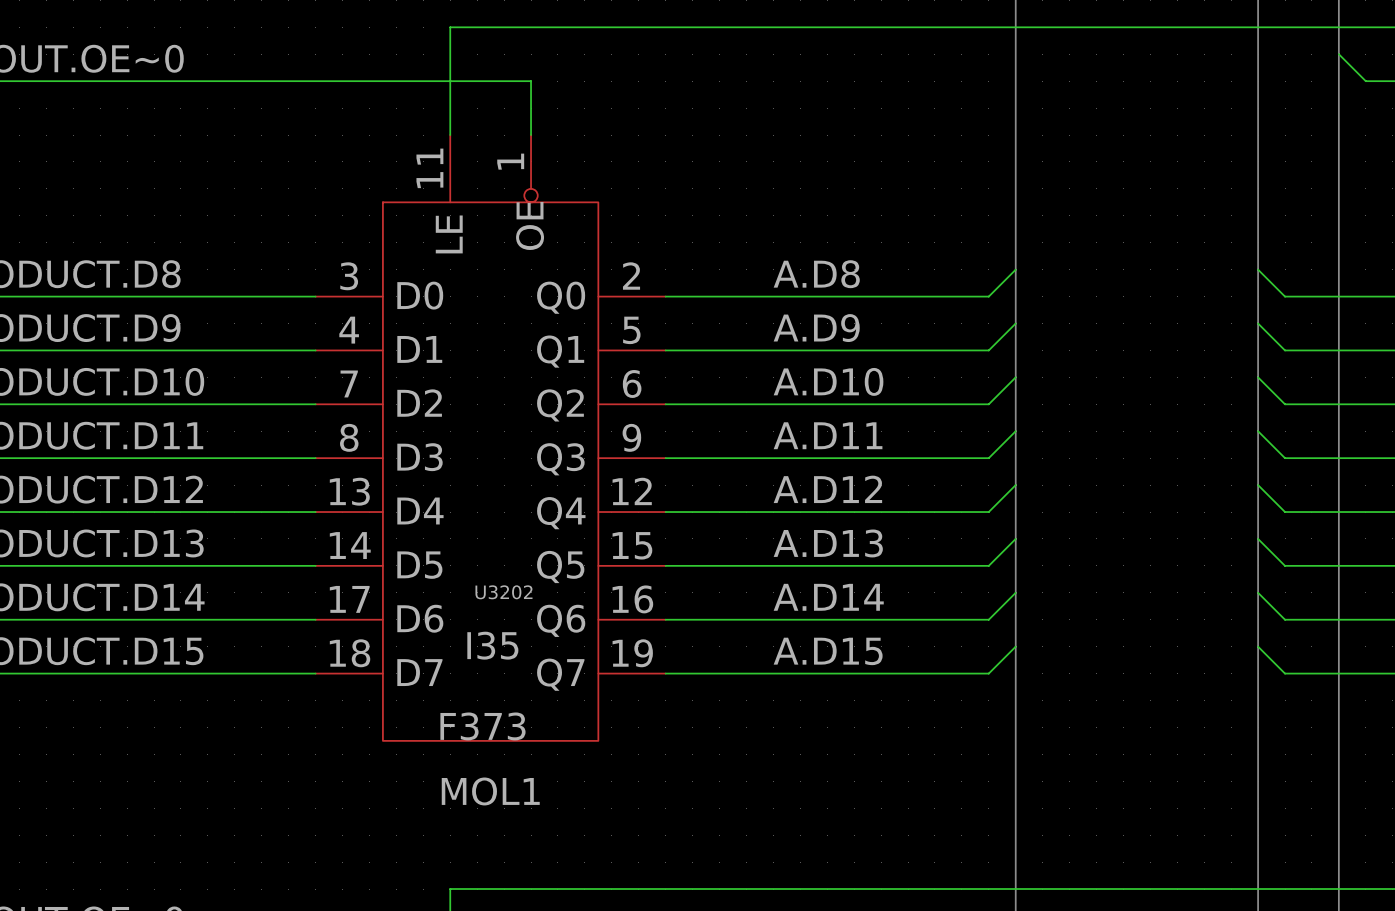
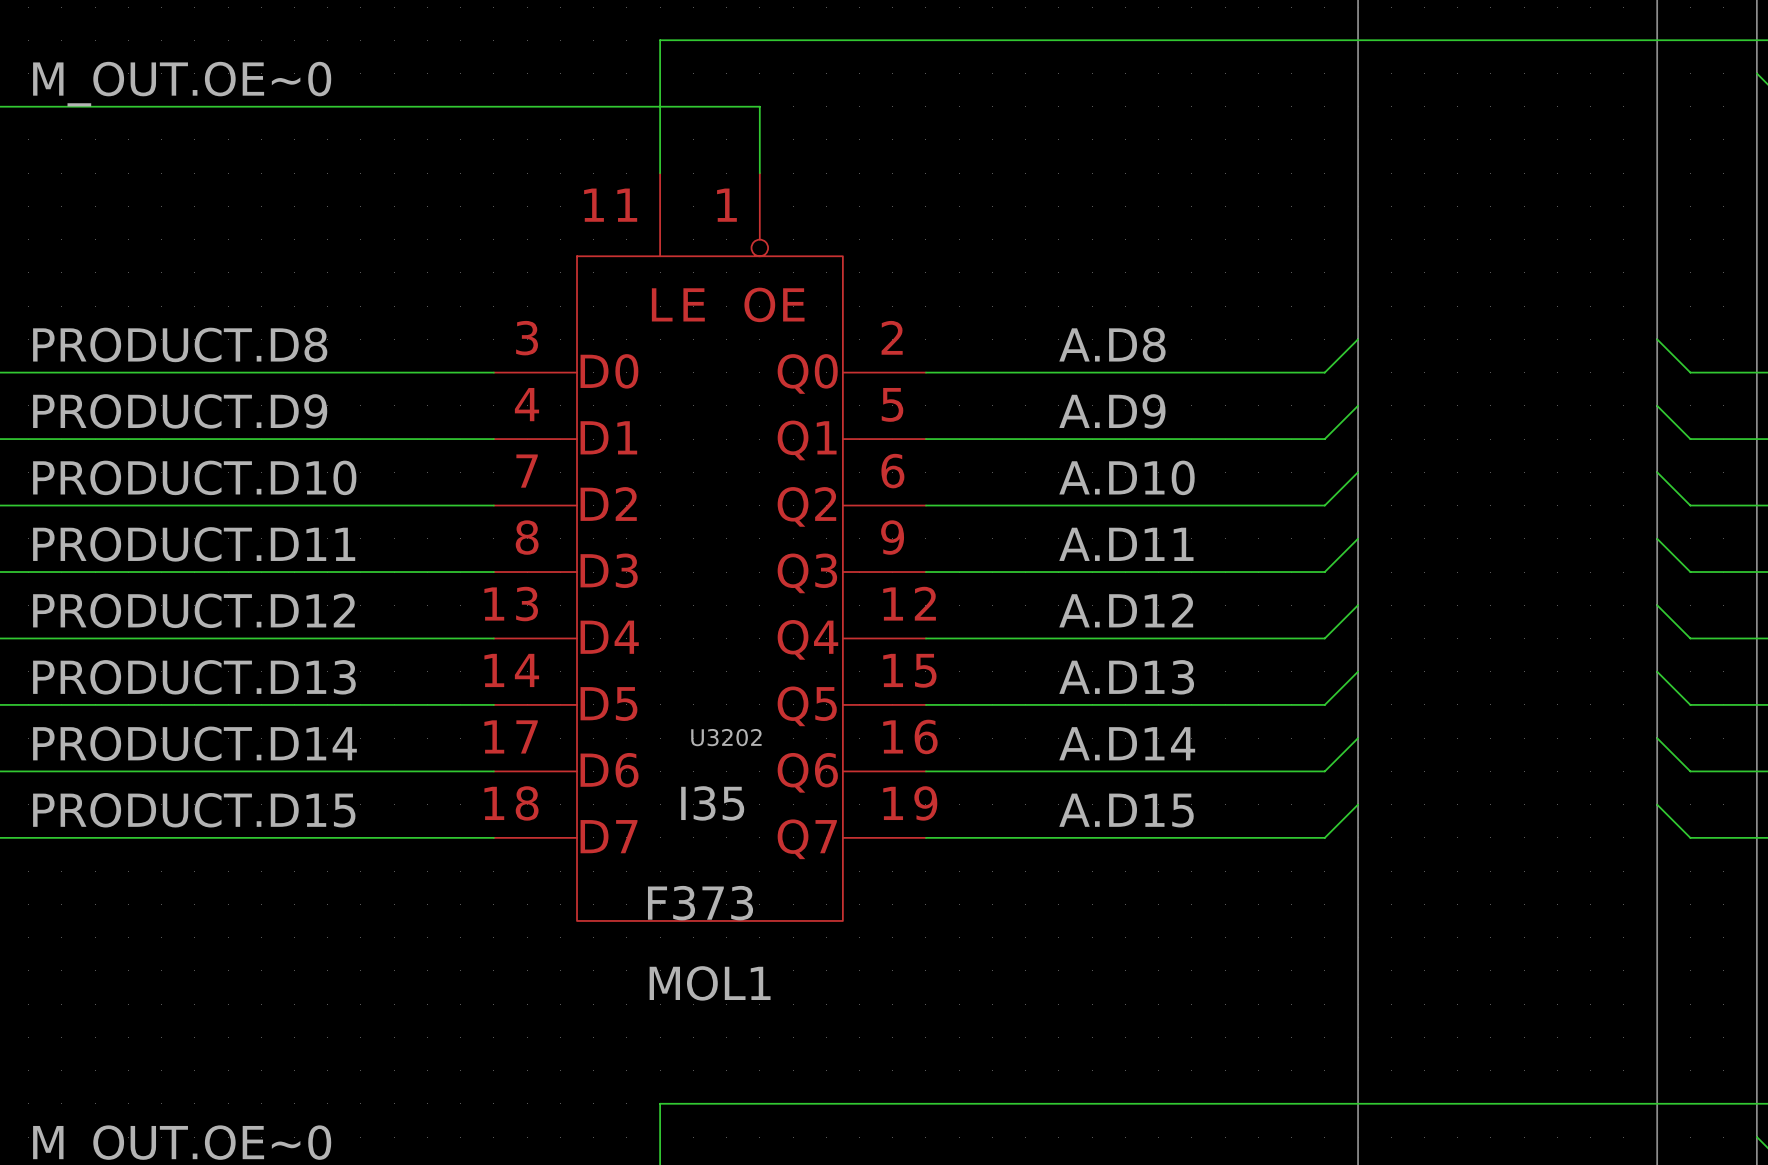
U3202 symbol: [315, 135, 666, 741] -> [493, 173, 926, 921]

